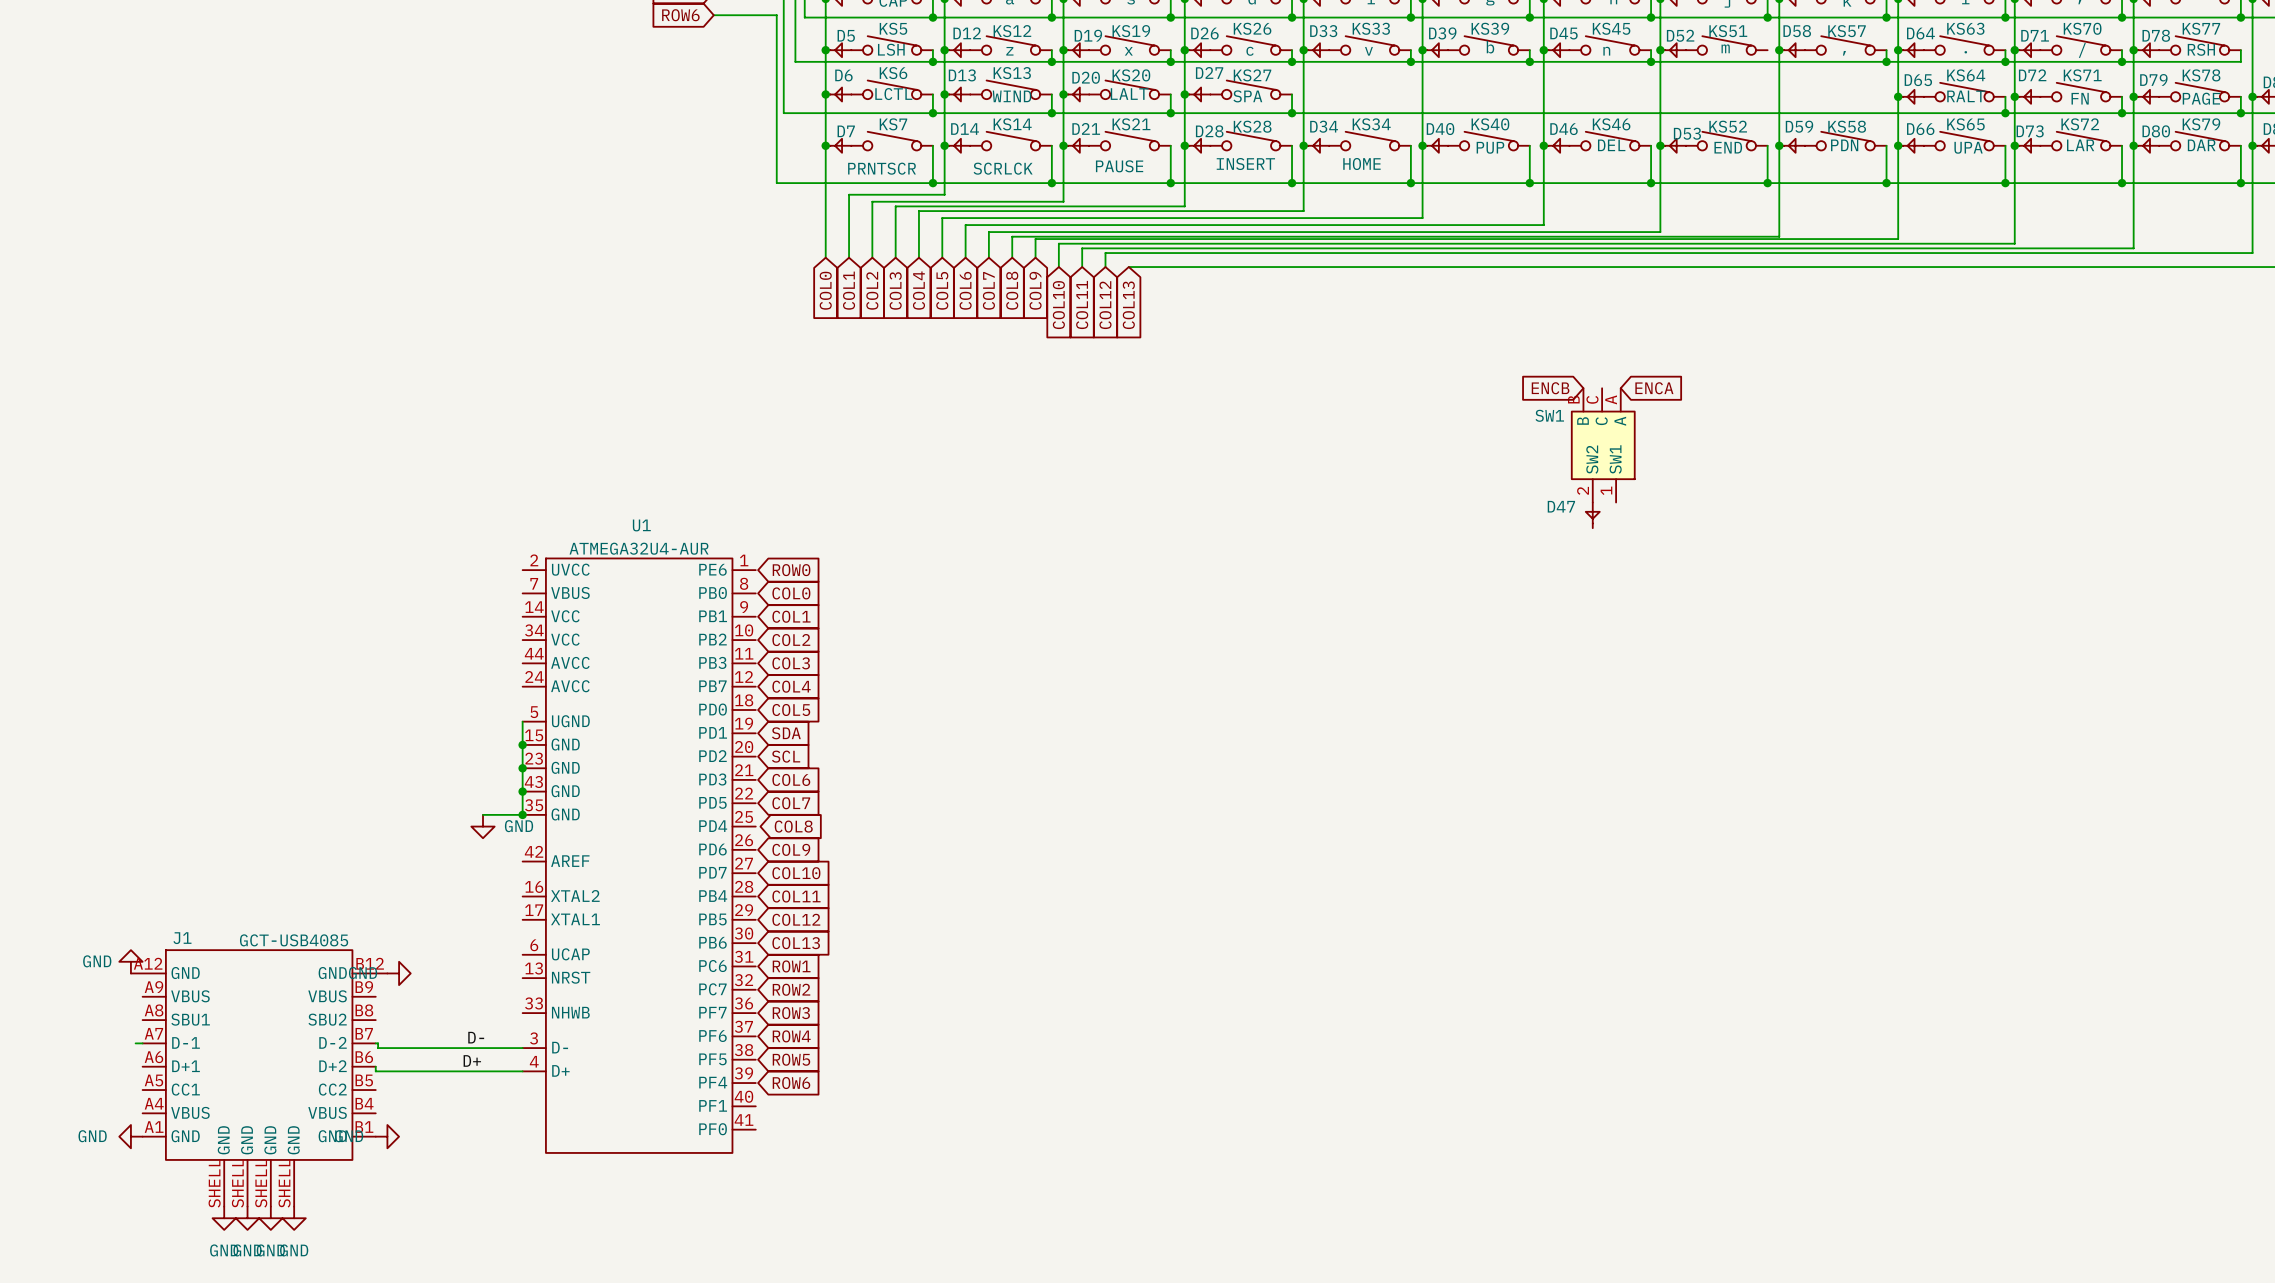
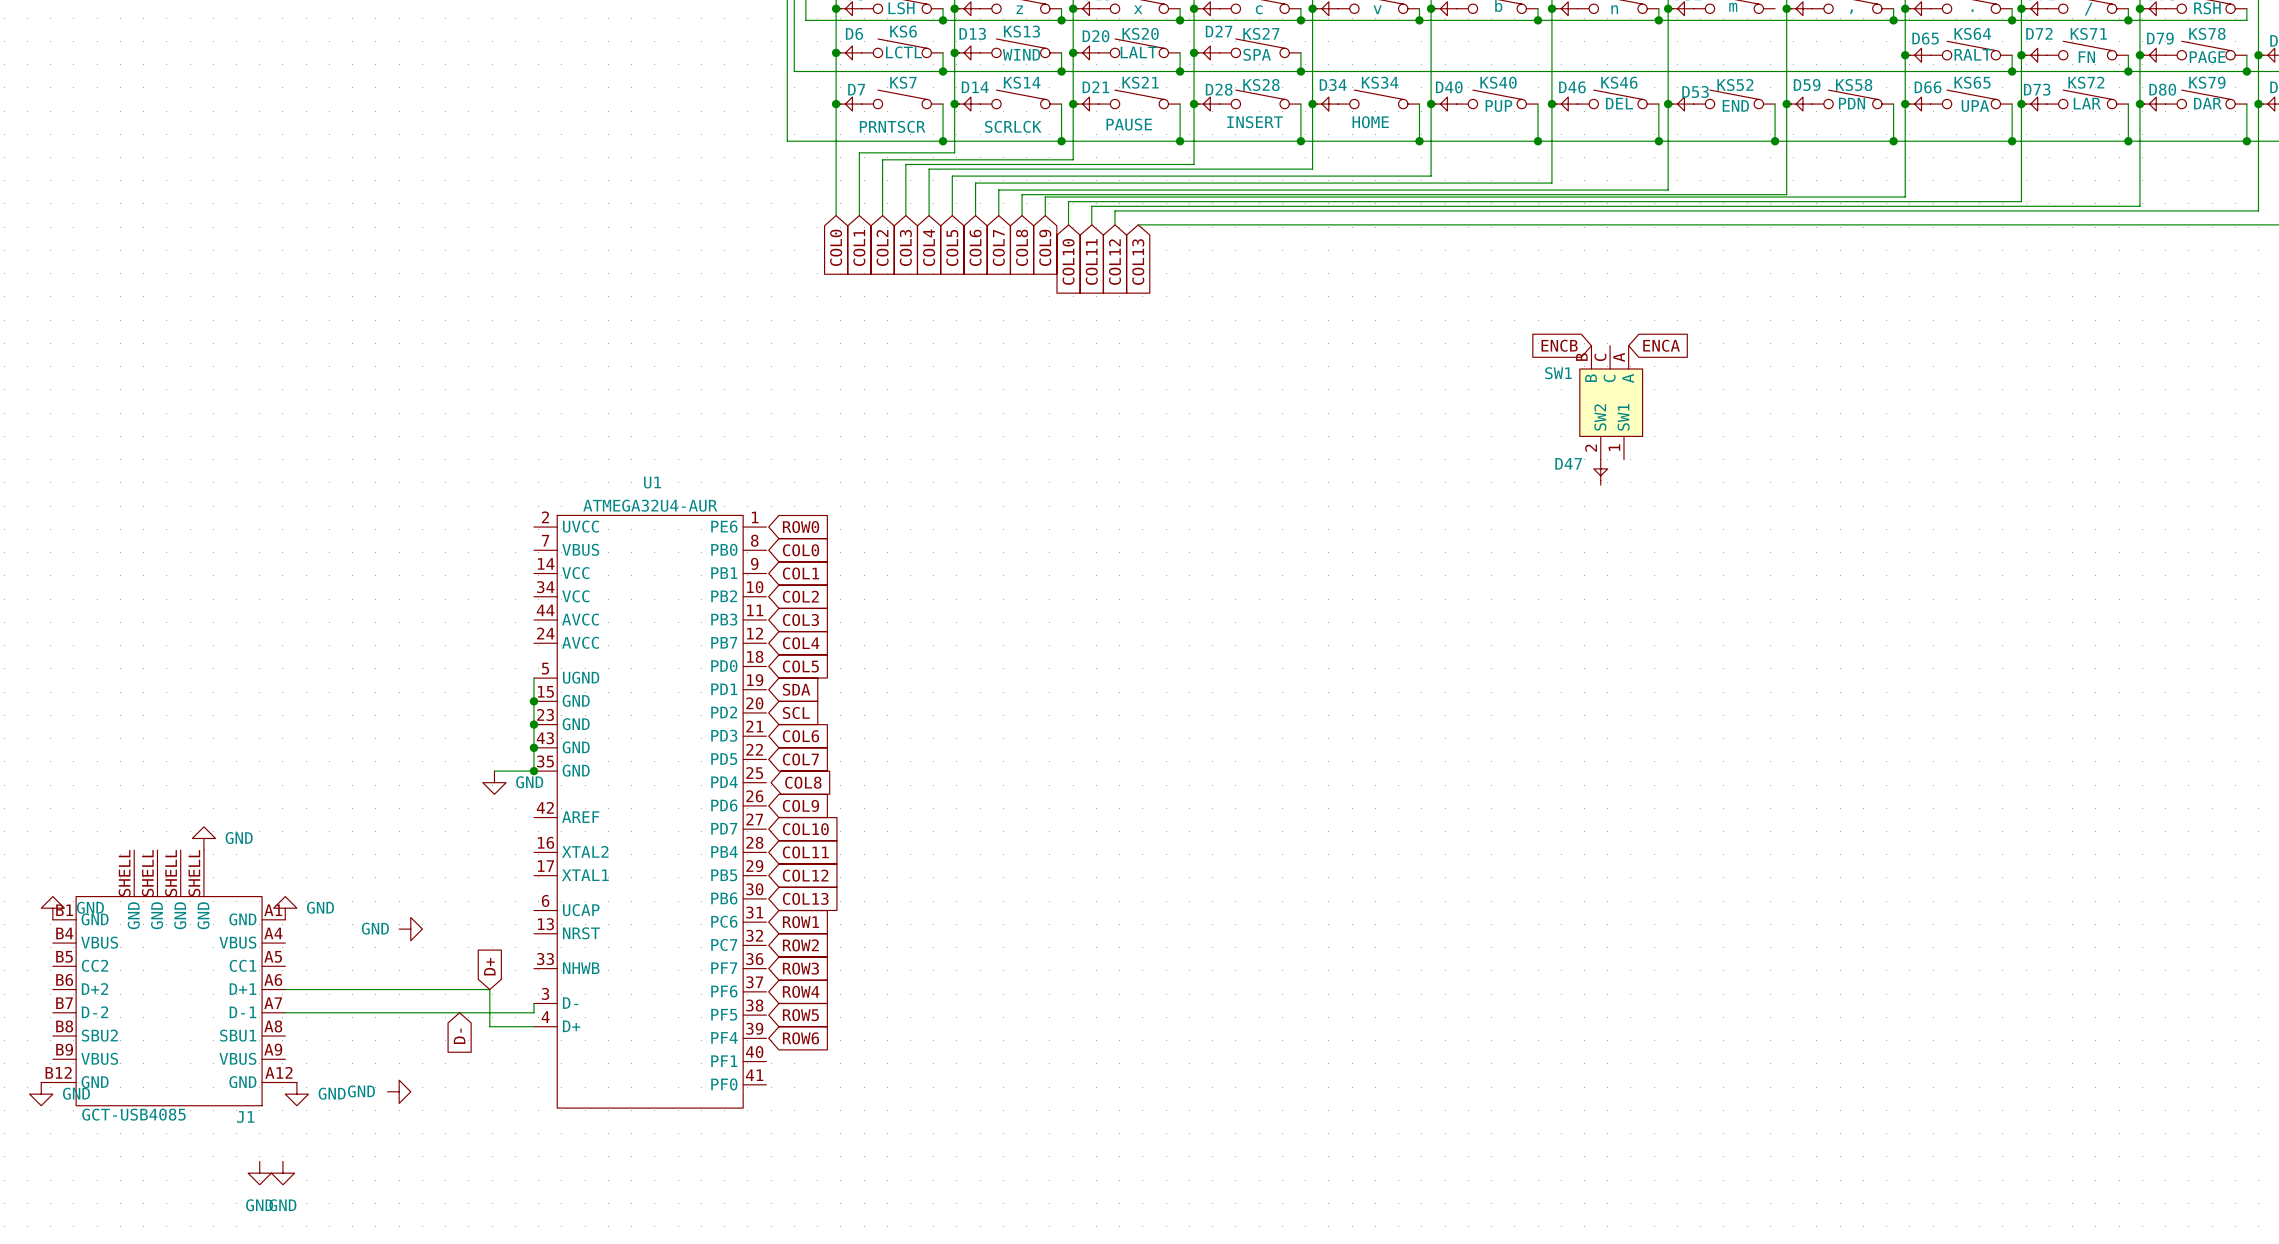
power symbol: none -> GND (203, 838)
power symbol: none -> GND (52, 908)
power symbol: none -> GND (285, 908)
power symbol: GND (130, 961) -> none
global label: none -> D+ (489, 966)
label: D- (476, 1037) -> none
wire: (135, 1043) (142, 1043) -> none
wire: (375, 1043) (378, 1043) (378, 1048) (522, 1048) -> (285, 1012) (533, 1012) (533, 1003)
J1 rotation: 0° (259, 1055) -> 180° (169, 1001)
label: D+ (472, 1060) -> none
wire: (375, 1066) (375, 1071) (478, 1071) -> (285, 989) (489, 989) (489, 1026)
global label: none -> D- (459, 1036)
power symbol: GND (130, 1136) -> none
power symbol: none -> GND (41, 1094)
power symbol: none -> GND (296, 1094)
power symbol: GND (224, 1218) -> none
power symbol: GND (294, 1218) -> none

